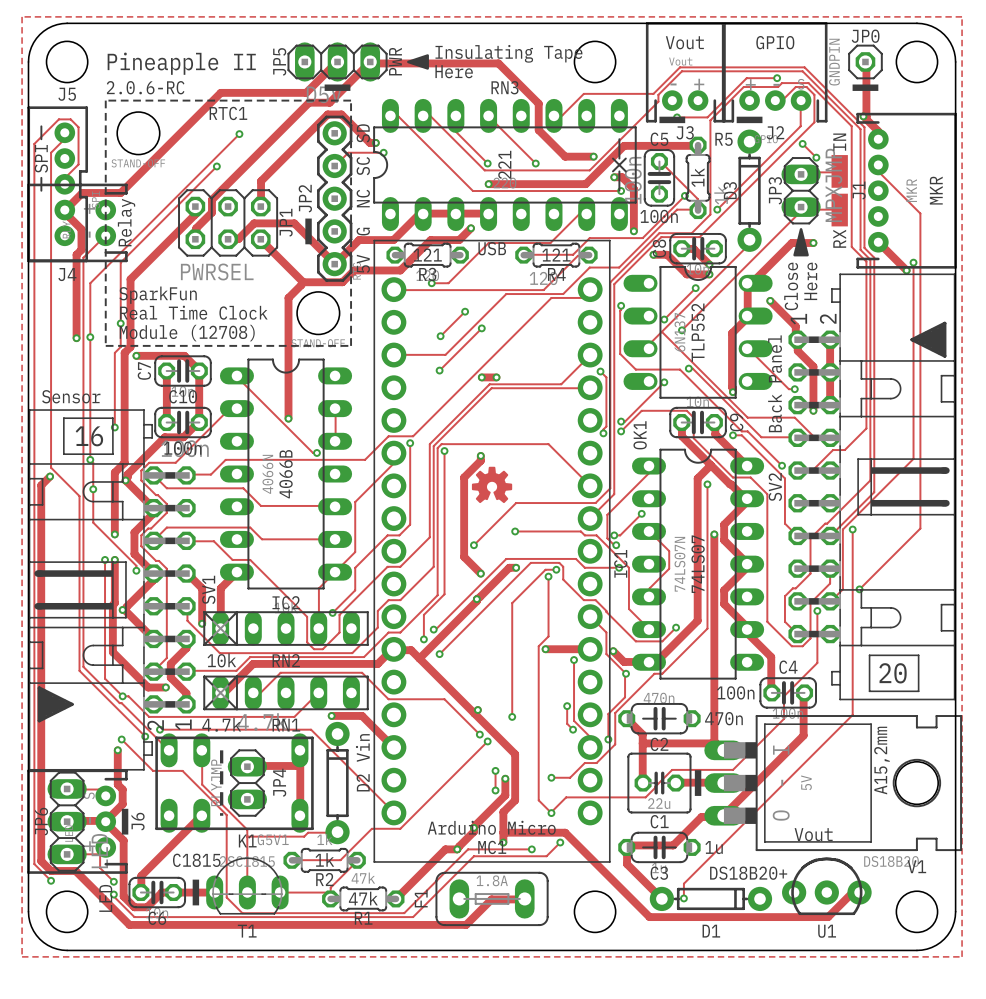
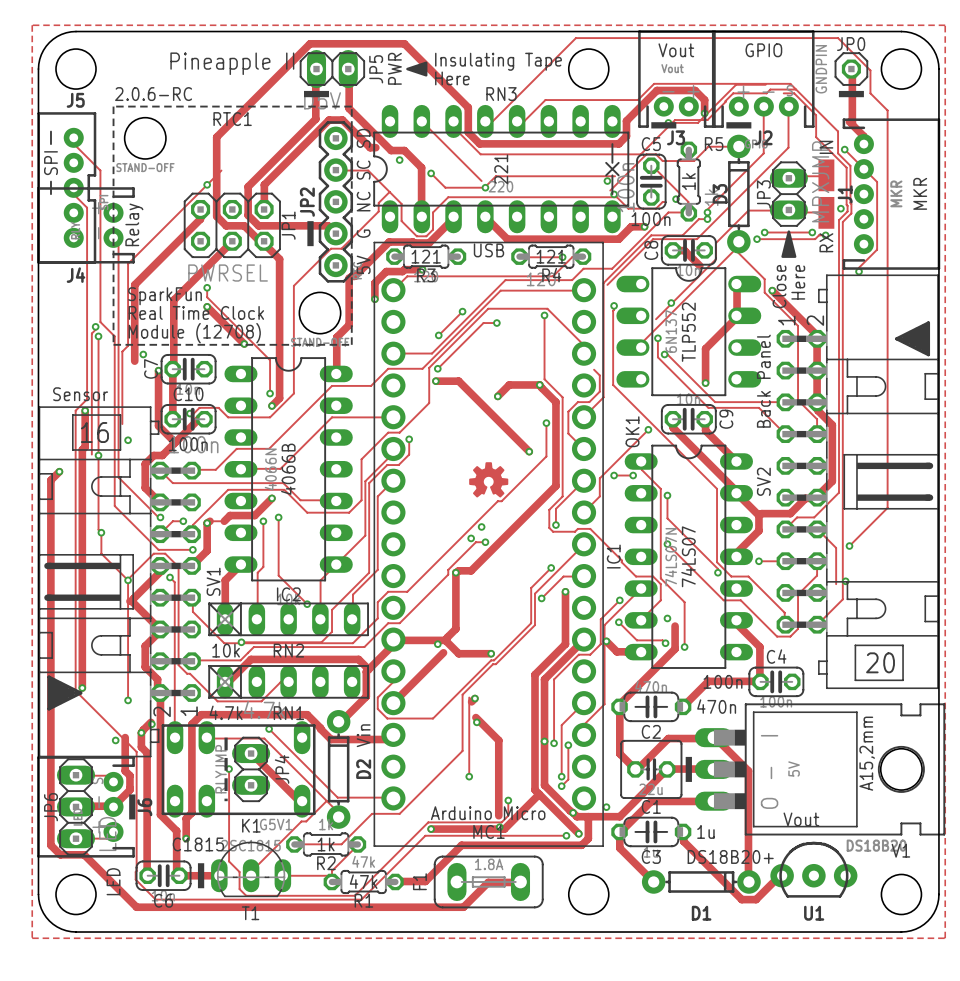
JP5 footprint: [287, 42, 388, 82] -> [299, 49, 366, 89]
JP5 name position: JP5 (279, 61) -> JP5 (376, 69)
track: none -> (316, 69) (315, 119) (248, 186) (248, 215) (258, 225)
track: (337, 61) (306, 92) (220, 92) (120, 192) (82, 192) (64, 210) (81, 229) (81, 249) (76, 254) (76, 338) -> none
track: none -> (348, 69) (349, 108) (391, 150) (404, 150) (421, 167) (421, 216)
text position: Pineapple II (181, 63) -> Pineapple II (232, 63)
via: (777, 78) -> none
drawing position: (337, 87) -> (316, 94)
track: (795, 87) (783, 99) (775, 100) -> (707, 209) (763, 153) (763, 106)
track: (583, 93) (562, 115) (553, 115) -> (577, 100) (545, 100) (524, 121) (517, 121)
track: (645, 93) (653, 93) (680, 67) (804, 67) (864, 127) (864, 161) -> (637, 100) (654, 83) (790, 83) (796, 89)
track: (735, 94) (710, 120) (710, 214) (708, 216) -> (707, 219) (698, 219)
track: (814, 94) (814, 122) (699, 237) -> (801, 100) (816, 115) (816, 137) (846, 167)
via: none -> (704, 113)
track: (390, 115) (398, 116) (472, 191) (621, 191) -> none
track: (488, 115) (535, 163) -> (485, 121) (493, 121) (575, 38) (838, 38) (870, 70) (870, 93) (887, 110) (887, 507) (849, 546)
track: (423, 116) (430, 116) (484, 170) (589, 170) (658, 101) (658, 94) (681, 71) (802, 71) (860, 129) (860, 163) -> (422, 121) (481, 181)
via: (863, 116) -> none
track: (456, 122) (456, 132) (487, 163) -> (453, 127) (480, 154) (640, 154) (675, 120) (707, 120) (725, 100)
track: (800, 126) (717, 209) -> (788, 131) (788, 147) (697, 239) (690, 239)
track: (64, 132) (64, 139) (51, 152) (51, 467) (79, 496) (79, 670) (145, 736) -> (73, 137) (74, 144) (100, 170) (100, 322) (114, 336) (114, 506) (148, 539)
track: (239, 134) (90, 283) (90, 337) -> none
via: (239, 134) -> none
track: none -> (738, 146) (708, 146) (694, 161) (662, 161) (656, 154) (646, 154) (610, 190)
via: (375, 142) -> none
track: (802, 143) (816, 157) -> none
via: (802, 143) -> none
track: none -> (844, 149) (863, 169)
via: none -> (844, 149)
track: (698, 145) (624, 145) (585, 184) (488, 184) -> none
track: (851, 148) (851, 246) (866, 261) (866, 428) (844, 450) (833, 450) (813, 469) (797, 470) -> (838, 153) (850, 165)
track: (383, 152) (348, 152) (334, 166) -> (665, 202) (662, 202) (656, 208) (628, 208) (616, 197) (448, 197) (433, 212) (433, 229) (426, 236) (416, 236) (401, 221) (401, 203) (368, 170) (335, 170)
via: (383, 152) -> none
via: none -> (399, 160)
track: (593, 156) (565, 156) (538, 130) (538, 103) (498, 63) (370, 61) (329, 102) (309, 102) (211, 199) -> (704, 113) (704, 100) (695, 90) (656, 90) (626, 121) (626, 136) (618, 143) (479, 143) (468, 132) (468, 107) (404, 43) (310, 43) (216, 137) (216, 202)
via: (593, 156) -> none
via: (816, 157) -> none
via: (487, 163) -> none
via: (535, 163) -> none
track: (879, 165) (879, 172) (920, 213) (920, 528) (859, 589) -> (864, 169) (877, 181) (877, 249) (859, 267) (859, 271)
via position: (216, 166) -> (207, 184)
track: none -> (431, 173) (445, 187) (484, 187) (495, 176) (615, 176)
via: none -> (431, 173)
track: (614, 177) (622, 177) (633, 189) (633, 231) -> none
track: (64, 184) (65, 177) (78, 164) (78, 127) (70, 119) (58, 119) (34, 143) (34, 864) (51, 880) -> (73, 187) (74, 195) (87, 207) (87, 399) (75, 410) (75, 690) (136, 751) (135, 879) (155, 899)
track: none -> (389, 191) (378, 202) (378, 211) (341, 248) (331, 248) (293, 285) (293, 393) (270, 417) (228, 417) (218, 407) (199, 407) (193, 413) (190, 413)
track: (684, 195) (642, 238) (589, 238) (573, 254) (523, 255) -> (562, 257) (519, 256)
track: (864, 199) (864, 247) (874, 257) (874, 492) (830, 535) -> (850, 202) (851, 213) (842, 222) (842, 599) (817, 624)
track: (860, 201) (860, 249) (870, 259) (870, 480) (852, 498) -> (846, 204) (847, 211) (839, 220) (839, 492)
via: none -> (840, 208)
track: (801, 207) (802, 209) (681, 330) -> (788, 210) (748, 210) (716, 242) (716, 259) (686, 288)
track: (211, 212) (196, 228) (195, 239) -> (216, 215) (226, 225) (244, 225) (259, 241) (264, 241) (279, 259) (279, 398) (271, 405)
track: (195, 214) (130, 279) (130, 347) (124, 352) (124, 462) (114, 472) (114, 534) -> (200, 217) (134, 284) (134, 361)
track: (488, 214) (419, 214) (393, 240) -> (453, 216) (429, 242) (393, 242)
track: none -> (485, 216) (507, 239) (618, 239) (631, 226) (644, 226)
track: (586, 214) (578, 214) (550, 243) (488, 243) (448, 283) (431, 283) -> none
via: none -> (707, 219)
track: (255, 223) (238, 239) (228, 239) -> (172, 369) (173, 300) (232, 241)
track: (294, 223) (334, 264) (359, 240) (389, 240) -> (296, 225) (328, 225) (335, 233)
via: none -> (644, 226)
track: (471, 228) (459, 240) (430, 240) (400, 270) -> (422, 269) (404, 269) (399, 271)
via: (471, 228) -> none
track: none -> (764, 232) (812, 232)
via: none -> (764, 232)
via: none -> (812, 232)
via: (633, 231) -> none
track: none -> (825, 235) (818, 235) (815, 239) (757, 239)
via: none -> (825, 235)
track: (105, 235) (83, 257) (83, 334) -> (95, 326) (91, 333)
track: none -> (113, 237) (118, 242) (118, 477) (160, 517)
via: none -> (757, 239)
track: (260, 239) (303, 282) -> none
track: none -> (389, 242) (354, 276) (349, 278) (349, 324) (336, 337) (336, 373)
track: (878, 242) (906, 270) -> none
track: (813, 243) (791, 243) (751, 283) (747, 283) -> none
via: (813, 243) -> none
track: (653, 254) (667, 254) (686, 274) (709, 274) -> none
via: (653, 254) -> none
via: none -> (562, 257)
track: (913, 262) (913, 458) (842, 529) (842, 589) (830, 601) -> none
via: (913, 262) -> none
via: (709, 264) -> none
track: (386, 270) (354, 270) (342, 282) (303, 282) -> (386, 271) (374, 283) (374, 299)
via: none -> (859, 271)
via: (906, 270) -> none
via: (709, 274) -> none
track: (558, 275) (543, 290) -> (583, 290) (538, 290)
track: (577, 279) (563, 294) (506, 294) (491, 308) -> (572, 280) (505, 280) (432, 353)
track: (303, 282) (288, 297) (288, 418) -> none
via position: (431, 283) -> (422, 269)
track: (614, 284) (614, 494) (606, 502) -> (648, 429) (599, 478) (599, 496)
track: none -> (207, 287) (207, 297) (270, 360) (270, 393)
via: none -> (207, 287)
via: (695, 288) -> none
track: (393, 289) (504, 290) -> (393, 290) (407, 276) (553, 276)
track: none -> (500, 290) (422, 368) (388, 368) (371, 385) (332, 385) (269, 448) (236, 448) (230, 455)
track: (589, 290) (581, 297) (551, 297) (413, 436) (400, 436) -> none
track: none -> (772, 290) (817, 335) (817, 338)
via: none -> (374, 299)
track: (770, 300) (795, 326) (797, 350) (813, 366) (813, 410) -> none
via position: (770, 300) -> (772, 290)
via: none -> (671, 303)
track: none -> (207, 306) (244, 344)
via: none -> (207, 306)
track: none -> (488, 308) (547, 308) (583, 344) (584, 353)
via: none -> (544, 315)
via: (664, 319) -> none
via: (120, 323) -> none
track: none -> (496, 323) (483, 323) (478, 327)
via position: (481, 328) -> (496, 323)
via: (681, 330) -> none
track: (661, 331) (747, 417) (794, 417) (814, 437) (830, 437) -> (738, 241) (735, 249) (764, 279) (764, 292) (798, 325) (798, 400) (817, 419) (817, 433)
track: (732, 333) (732, 392) -> (721, 332) (705, 348) (705, 383)
via position: (76, 338) -> (95, 326)
via: none -> (657, 338)
via: none -> (244, 344)
track: (747, 348) (788, 389) (794, 389) -> none
track: (620, 353) (635, 369) (680, 369) (741, 431) (747, 431) (782, 465) -> (613, 352) (613, 384) (717, 488) (717, 562) (731, 576) (748, 576) (784, 612) (784, 624)
track: (433, 354) (445, 354) -> (399, 432) (429, 403) (429, 367) (443, 353)
track: (136, 355) (184, 355) (199, 371) (199, 422) (183, 437) (164, 437) (127, 474) (125, 480) (138, 493) -> (204, 419) (198, 419) (162, 455) (153, 455) (145, 464) (145, 487)
track: (590, 355) (561, 384) (489, 384) (429, 444) (429, 537) (400, 566) (387, 566) (339, 614) (339, 632) (330, 641) -> (369, 483) (369, 572) (332, 609) (332, 631)
track: none -> (664, 354) (667, 354) (715, 402) (785, 402)
via: none -> (664, 354)
track: (688, 368) (692, 368) (761, 437) (796, 437) -> (657, 338) (657, 357) (708, 407) (758, 407) (784, 433)
via: (688, 368) -> none
via: (600, 371) -> none
track: none -> (158, 370) (158, 425) (175, 442)
via: none -> (158, 370)
track: (236, 375) (313, 452) (316, 452) -> none
track: (481, 377) (496, 377) -> none
via: (481, 377) -> none
via: (496, 377) -> none
track: (664, 382) (625, 421) (621, 421) -> none
via: (664, 382) -> none
track: none -> (435, 381) (458, 381) (529, 451)
via: none -> (435, 381)
via: none -> (705, 383)
via: none -> (539, 384)
track: (590, 387) (491, 388) (433, 446) (433, 566) (400, 600) -> (546, 423) (546, 456) (501, 501) (497, 501) (407, 591) (399, 591)
via: (794, 389) -> none
via: (732, 392) -> none
track: (606, 394) (606, 426) (603, 429) (603, 433) -> (599, 391) (589, 402) (577, 402) (568, 411) (568, 433) (584, 449)
via: none -> (270, 393)
track: none -> (497, 396) (509, 384) (539, 384) (555, 402) (555, 486) (471, 570) (458, 570) (455, 572) (455, 628) (445, 640)
via: none -> (497, 396)
track: (610, 400) (610, 488) (595, 503) (516, 503) (473, 545) -> (603, 397) (584, 417)
track: none -> (817, 402) (818, 410) (832, 425) (832, 481) (817, 498) (805, 498) (790, 513) (761, 513) (758, 515)
track: (236, 408) (229, 408) (175, 462) (149, 462) (141, 470) (141, 480) (166, 504) (166, 512) (141, 535) (141, 546) -> none
via: none -> (271, 405)
track: (335, 408) (335, 441) -> none
via: (813, 410) -> none
track: none -> (85, 410) (85, 446) (82, 449) (82, 688)
via: none -> (85, 410)
via: none -> (190, 413)
via: (288, 418) -> none
track: none -> (393, 417) (332, 417) (280, 468) (240, 469)
via: (621, 421) -> none
via: none -> (546, 423)
via position: (114, 427) -> (128, 440)
track: (621, 431) (641, 410) (686, 410) (693, 417) (693, 438) (732, 477) (750, 477) (767, 494) (767, 621) (791, 646) -> (667, 544) (723, 600) (740, 600) (777, 636) (779, 636)
via: (621, 431) -> none
track: (681, 431) (681, 436) (747, 498) (746, 502) (724, 524) (724, 540) (747, 564) (746, 567) (724, 590) (724, 604) (745, 625) (747, 629) -> (673, 427) (758, 515)
via: (603, 433) -> none
via: none -> (648, 429)
track: (732, 435) (741, 435) (784, 478) (784, 523) (797, 535) -> none
via: (732, 435) -> none
track: (444, 451) (444, 594) (423, 614) (423, 639) -> none
via: (444, 451) -> none
via: (316, 452) -> none
track: (480, 455) (480, 460) (464, 477) (464, 556) (480, 573) -> none
via: (480, 455) -> none
via: none -> (529, 451)
track: (393, 457) (393, 463) (387, 469) -> (409, 454) (398, 465) (387, 465)
track: (83, 458) (83, 666) (168, 750) -> (169, 577) (174, 582) (174, 737)
track: (410, 458) (410, 524) (399, 535) (387, 535) (355, 567) (355, 590) (332, 612) -> none
track: (90, 459) (93, 462) (93, 522) (136, 565) (136, 570) -> (98, 455) (98, 529) (101, 532) (101, 553) (128, 580)
track: (225, 459) (365, 459) -> (191, 534) (192, 525) (228, 489) (284, 489) (307, 512) (349, 512) (361, 500) (361, 459) (365, 455)
track: (710, 465) (697, 478) (697, 620) (658, 660) (649, 662) -> none
via: (782, 465) -> none
track: (649, 466) (648, 473) (607, 514) (607, 538) (616, 545) -> (641, 461) (641, 469) (660, 488) (660, 544)
via: (125, 480) -> none
track: none -> (614, 475) (633, 475)
via: none -> (614, 475)
via: none -> (633, 475)
track: (707, 484) (707, 628) (662, 673) (654, 673) (615, 713) (615, 744) (596, 763) (584, 763) (570, 777) (551, 777) -> none
via: (707, 484) -> none
track: none -> (393, 480) (377, 496) (377, 569) (352, 594) (352, 619)
track: (590, 485) (548, 444) (441, 444) (437, 448) (437, 595) -> (485, 542) (475, 542) (448, 569) (448, 574) (435, 587)
track: none -> (584, 480) (555, 508) (555, 525)
track: (243, 488) (261, 505) (298, 505) -> (247, 483) (283, 483) (300, 500)
track: (368, 488) (355, 502) (355, 552) -> (393, 453) (365, 481) (365, 535) (355, 545)
via: (93, 489) -> none
track: none -> (667, 495) (667, 518) (717, 568) (717, 572)
via: none -> (667, 495)
via: none -> (271, 498)
track: (153, 508) (153, 513) (134, 532) (134, 554) (153, 573) -> none
track: (641, 513) (620, 535) (614, 535) -> none
via: (641, 513) -> none
track: none -> (758, 515) (758, 530) (737, 552) (736, 556)
via: none -> (160, 517)
track: none -> (278, 517) (278, 575) (307, 604)
via: none -> (278, 517)
track: (825, 523) (810, 538) (810, 573) (784, 596) (784, 621) (796, 633) -> (812, 517) (797, 517) (785, 529)
track: (177, 527) (205, 527) -> (191, 565) (207, 550) (207, 523) (210, 521)
via: none -> (183, 521)
track: (219, 527) (250, 527) (262, 539) (335, 539) -> (224, 521) (230, 515) (254, 515) (271, 498)
track: none -> (263, 521) (263, 567) (257, 572) (256, 619)
via: none -> (263, 521)
via: none -> (207, 523)
track: (852, 529) (852, 714) (683, 883) (683, 898) -> none
via position: (852, 529) -> (849, 546)
track: (515, 531) (580, 531) (584, 535) -> (544, 315) (544, 379) (562, 397) (562, 496) (549, 509) (549, 527) (553, 531) (575, 531) (578, 528)
via: (515, 531) -> none
via: none -> (555, 525)
track: (649, 531) (669, 551) -> none
via: none -> (481, 526)
via: (114, 534) -> none
track: (714, 534) (714, 741) (723, 750) (711, 743) (642, 743) -> none
via: (714, 534) -> none
via: (614, 535) -> none
track: none -> (817, 529) (836, 547) (836, 584)
via: none -> (101, 532)
track: (186, 540) (213, 541) (232, 559) (250, 559) (307, 616) (307, 642) (314, 649) (322, 649) -> (241, 642) (321, 642) (324, 639)
via: (616, 545) -> none
via: none -> (485, 542)
via: none -> (667, 544)
track: (152, 556) (156, 560) -> (158, 549) (192, 549)
via: none -> (192, 549)
track: (105, 559) (105, 678) (122, 696) (128, 696) (149, 716) (294, 716) (318, 692) -> none
via: (105, 559) -> none
track: (114, 559) (112, 652) (138, 677) -> (160, 629) (145, 646) (145, 667)
via: (114, 559) -> none
track: none -> (162, 553) (153, 553) (128, 579) (128, 700)
track: (516, 567) (509, 567) (419, 658) -> none
via: (516, 567) -> none
track: (619, 567) (584, 567) (575, 558) (506, 558) (433, 629) -> none
via: (619, 567) -> none
track: (166, 568) (166, 658) (153, 671) -> (172, 561) (178, 567) (178, 665) (217, 701) (261, 701) (280, 682) (288, 681)
track: (669, 568) (649, 588) (649, 596) -> (660, 561) (660, 578) (684, 602) (684, 647)
via: none -> (758, 561)
track: none -> (785, 561) (758, 561)
track: (556, 569) (545, 569) (512, 603) (512, 716) -> none
via: (556, 569) -> none
track: (628, 569) (628, 608) (649, 629) -> (621, 562) (636, 576) (653, 576) (660, 584) (660, 600) (641, 620)
via: (136, 570) -> none
track: (186, 573) (202, 588) (202, 623) -> none
via: (480, 573) -> none
track: none -> (551, 567) (531, 587) (531, 623) (433, 718) (387, 718) (377, 709) (377, 697) (393, 682) (393, 671)
via: none -> (551, 567)
track: (548, 576) (548, 636) (538, 646) (538, 800) (551, 813) (566, 797) (645, 797) (672, 769) (732, 769) (784, 718) (784, 696) (817, 662) (817, 610) -> none
via: (548, 576) -> none
via: none -> (455, 572)
via: none -> (717, 572)
track: none -> (584, 576) (563, 576) (541, 598)
via: none -> (169, 577)
via: none -> (128, 580)
via: (476, 599) -> none
track: none -> (565, 591) (565, 644) (535, 674) (535, 790) (578, 833)
via: none -> (565, 591)
via: none -> (541, 598)
track: none -> (619, 600) (600, 619) (600, 644) (590, 654) (578, 654) (554, 679) (554, 743)
via: none -> (619, 600)
via: (122, 609) -> none
via: (817, 610) -> none
via position: (332, 612) -> (307, 604)
track: (590, 616) (606, 632) (606, 654) (626, 673) (625, 697) (608, 713) (608, 739) -> none
via: (202, 623) -> none
track: (676, 627) (662, 641) (635, 641) -> (665, 643) (662, 640) (636, 640) (628, 631)
via: (433, 629) -> none
track: (626, 631) (595, 600) (583, 600) (563, 579) (563, 566) (559, 562) (530, 562) (439, 654) -> none
via: none -> (618, 622)
track: none -> (675, 626) (675, 648) (620, 703) (619, 706)
track: (186, 638) (186, 648) (170, 663) (170, 677) (186, 693) (186, 704) -> none
via: (423, 639) -> none
track: (393, 649) (377, 663) (253, 663) (247, 669) -> (368, 669) (358, 659) (251, 659)
track: none -> (393, 639) (393, 644) (366, 671) (366, 696) (341, 721) (338, 721)
track: (545, 649) (590, 649) -> (667, 769) (619, 816) (576, 816) (544, 785) (544, 679) (584, 639)
via: (545, 649) -> none
track: (411, 650) (515, 754) (515, 800) (503, 812) (503, 842) -> (410, 640) (445, 640)
track: none -> (445, 640) (458, 653) (491, 653)
via: none -> (241, 642)
via: none -> (665, 643)
via: none -> (684, 647)
track: (574, 660) (574, 720) (589, 736) (590, 747) -> (641, 588) (604, 625) (604, 704) (584, 724) (584, 734)
via: (574, 660) -> none
track: none -> (443, 652) (393, 703)
via: none -> (491, 653)
via: (626, 673) -> none
track: (148, 687) (165, 687) -> none
via: (165, 687) -> none
track: (253, 692) (261, 692) (280, 672) (362, 672) (388, 699) (444, 699) (479, 734) -> none
track: none -> (760, 681) (708, 681) (683, 706)
track: (804, 692) (803, 735) (723, 815) (701, 817) (673, 845) (629, 845) -> (713, 801) (651, 801) (622, 830)
via: (122, 696) -> none
via: none -> (82, 688)
track: (567, 706) (567, 723) (573, 729) -> none
via: (567, 706) -> none
track: none -> (469, 697) (469, 776)
via: none -> (128, 700)
track: none -> (584, 703) (561, 725) (561, 776)
track: (331, 715) (362, 715) (393, 747) -> (186, 838) (186, 818) (191, 812) (191, 724) (201, 714) (307, 714) (331, 739) (389, 739) (393, 734)
via: (331, 715) -> none
via: (512, 716) -> none
track: (627, 718) (642, 734) (642, 782) -> (619, 707) (619, 753) (635, 769)
track: (159, 729) (311, 729) (393, 812) -> (269, 729) (337, 797) (393, 797)
via: (159, 729) -> none
track: none -> (475, 717) (498, 740) (498, 815)
via: (573, 729) -> none
track: (121, 739) (153, 770) (182, 770) (226, 815) (226, 897) (235, 906) -> (229, 769) (229, 861) (239, 871) (239, 889)
via: (121, 739) -> none
via: (608, 739) -> none
via: none -> (269, 729)
track: (487, 741) (465, 764) -> (584, 544) (535, 593) (535, 625) (462, 694) (462, 750)
via: (487, 741) -> none
via: none -> (141, 732)
via: (117, 750) -> none
track: (202, 751) (202, 784) (247, 829) (247, 892) -> (207, 738) (264, 738) (337, 811) (338, 817)
via: none -> (115, 740)
via: none -> (544, 741)
via: none -> (554, 743)
track: none -> (568, 745) (568, 779) (561, 786)
via: none -> (568, 745)
track: (247, 766) (297, 765) (299, 750) (299, 815) -> (251, 753) (298, 800) (302, 801)
track: (495, 770) (495, 790) -> none
via: (495, 770) -> none
via: (551, 777) -> none
track: (505, 778) (505, 795) (475, 824) (473, 831) (457, 849) (445, 849) (396, 898) -> (588, 816) (588, 838) (581, 845) (461, 845) (425, 881) (395, 881)
via: (505, 778) -> none
via: none -> (229, 769)
track: none -> (635, 769) (668, 738) (713, 737) (717, 739) (748, 770) (748, 881)
via: none -> (469, 776)
via: (495, 790) -> none
via: none -> (561, 776)
via: none -> (561, 786)
track: none -> (539, 794) (504, 829) (431, 829)
via: (551, 813) -> none
track: (201, 815) (141, 875) (140, 892) -> (150, 722) (141, 732) (141, 747) (147, 752) (147, 875)
via: none -> (508, 800)
track: (105, 821) (123, 840) (123, 896) (134, 907) (147, 907) (161, 892) (173, 892) -> (154, 676) (157, 679) (157, 689) (160, 693) (160, 814) (176, 830) (176, 872) (179, 875)
via: none -> (606, 807)
via: (473, 827) -> none
via: none -> (573, 812)
track: (337, 832) (308, 832) -> (326, 800) (310, 817)
track: (503, 832) (565, 832) (649, 917) (752, 917) -> (683, 831) (683, 841) (741, 899)
track: (247, 836) (299, 836) -> (251, 875) (251, 871) (301, 821)
track: (560, 842) (546, 856) (473, 856) (413, 917) (361, 917) -> (566, 835) (425, 835) (361, 899)
via: (560, 842) -> none
via: none -> (431, 829)
track: (105, 847) (100, 854) (100, 868) (113, 881) -> none
via: (457, 849) -> none
track: (531, 849) (468, 849) (404, 913) (354, 913) -> (508, 800) (508, 815) (501, 822) (428, 822) (354, 895)
via: (531, 849) -> none
via: none -> (578, 833)
via: none -> (566, 835)
via: none -> (186, 838)
via: (51, 880) -> none
via: (113, 881) -> none
track: (859, 892) (852, 892) (828, 917) (767, 917) -> (782, 875) (756, 899)
track: (113, 894) (134, 917) (149, 917) -> none
via: (113, 894) -> none
via: (683, 898) -> none

